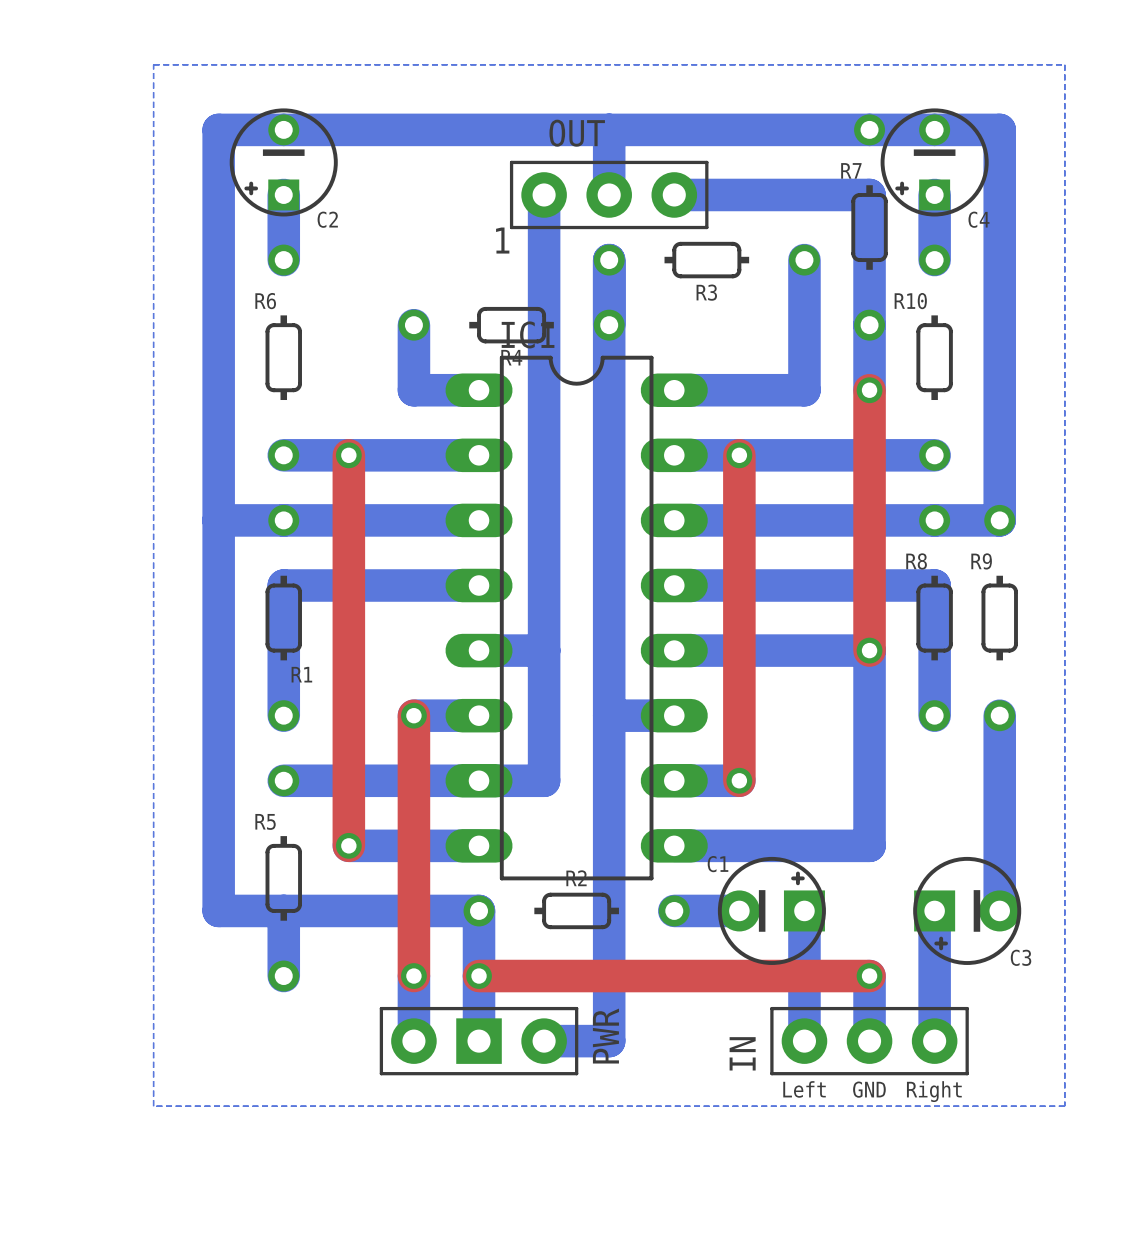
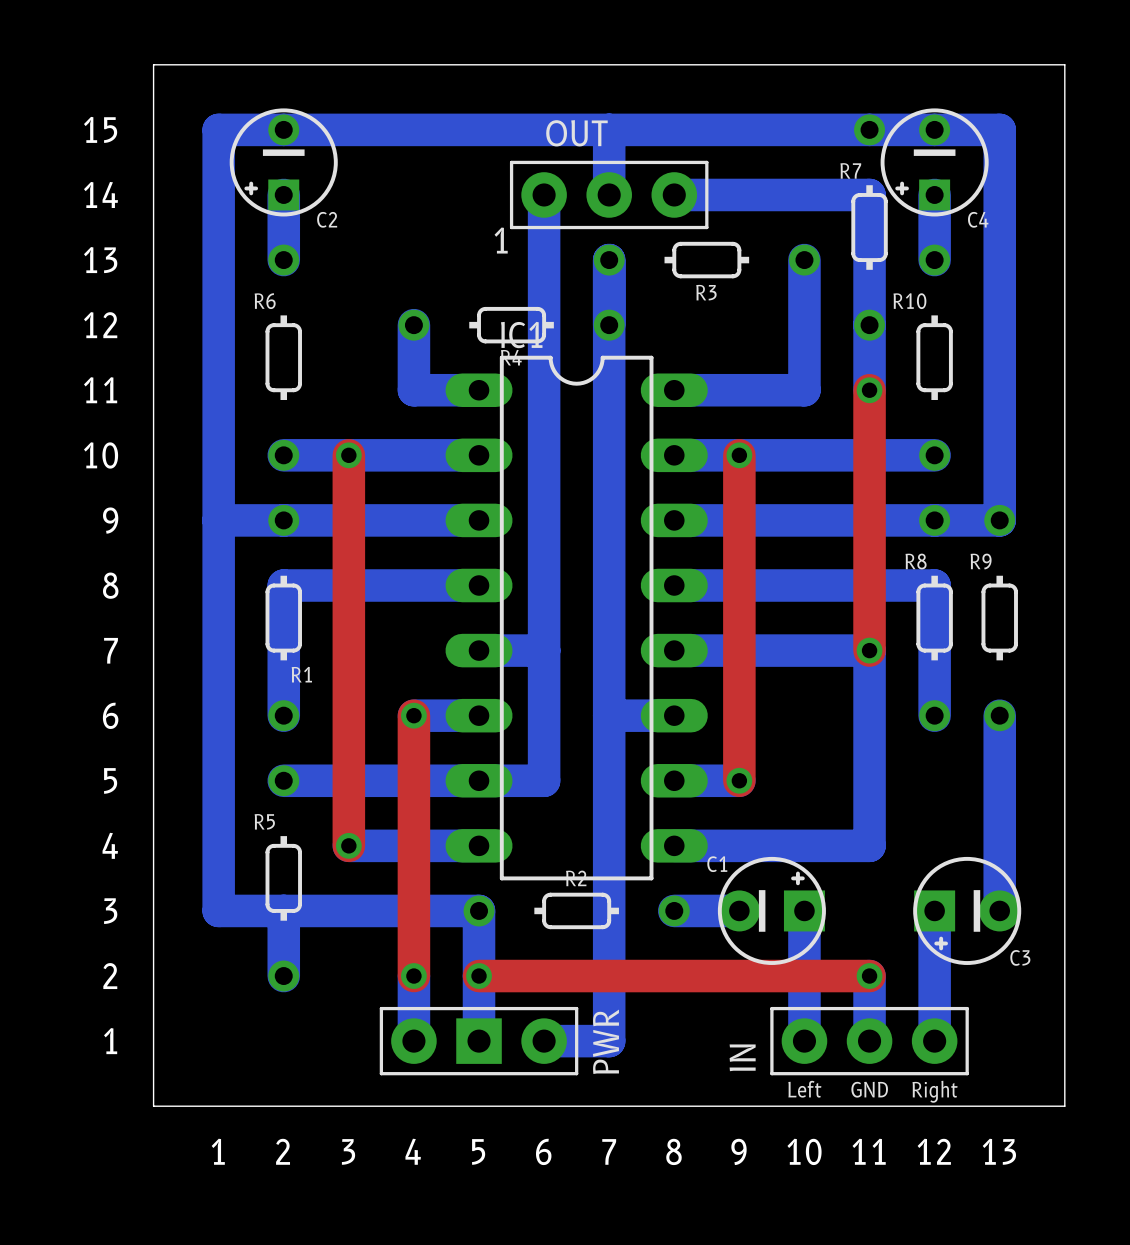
bottom zone outline: (153, 64) (1064, 64) (1064, 1106) (153, 1106) (153, 64) -> none
board edge: none -> (153, 64) (1064, 64) (1064, 1106) (153, 1106) (153, 64)
text: none -> 15 (100, 129)
text: none -> 14 (100, 194)
text: none -> 13 (100, 260)
text: none -> 12 (100, 325)
text: none -> 11 (100, 390)
text: none -> 10 (101, 455)
text: none -> 9 (110, 520)
text: none -> 8 (110, 585)
text: none -> 7 (111, 650)
text: none -> 6 (110, 715)
text: none -> 5 (110, 780)
text: none -> 4 (110, 845)
text: none -> 3 (110, 911)
text: none -> 2 (110, 976)
text: none -> 1 (110, 1041)
text: none -> 1 (218, 1151)
text: none -> 2 (283, 1151)
text: none -> 3 (348, 1151)
text: none -> 4 (413, 1151)
text: none -> 6 (543, 1151)
text: none -> 7 (609, 1151)
text: none -> 8 (673, 1151)
text: none -> 9 (738, 1151)
text: none -> 10 (804, 1151)
text: none -> 11 (869, 1151)
text: none -> 12 (934, 1151)
text: none -> 13 (999, 1151)
text: none -> 5 (478, 1151)

